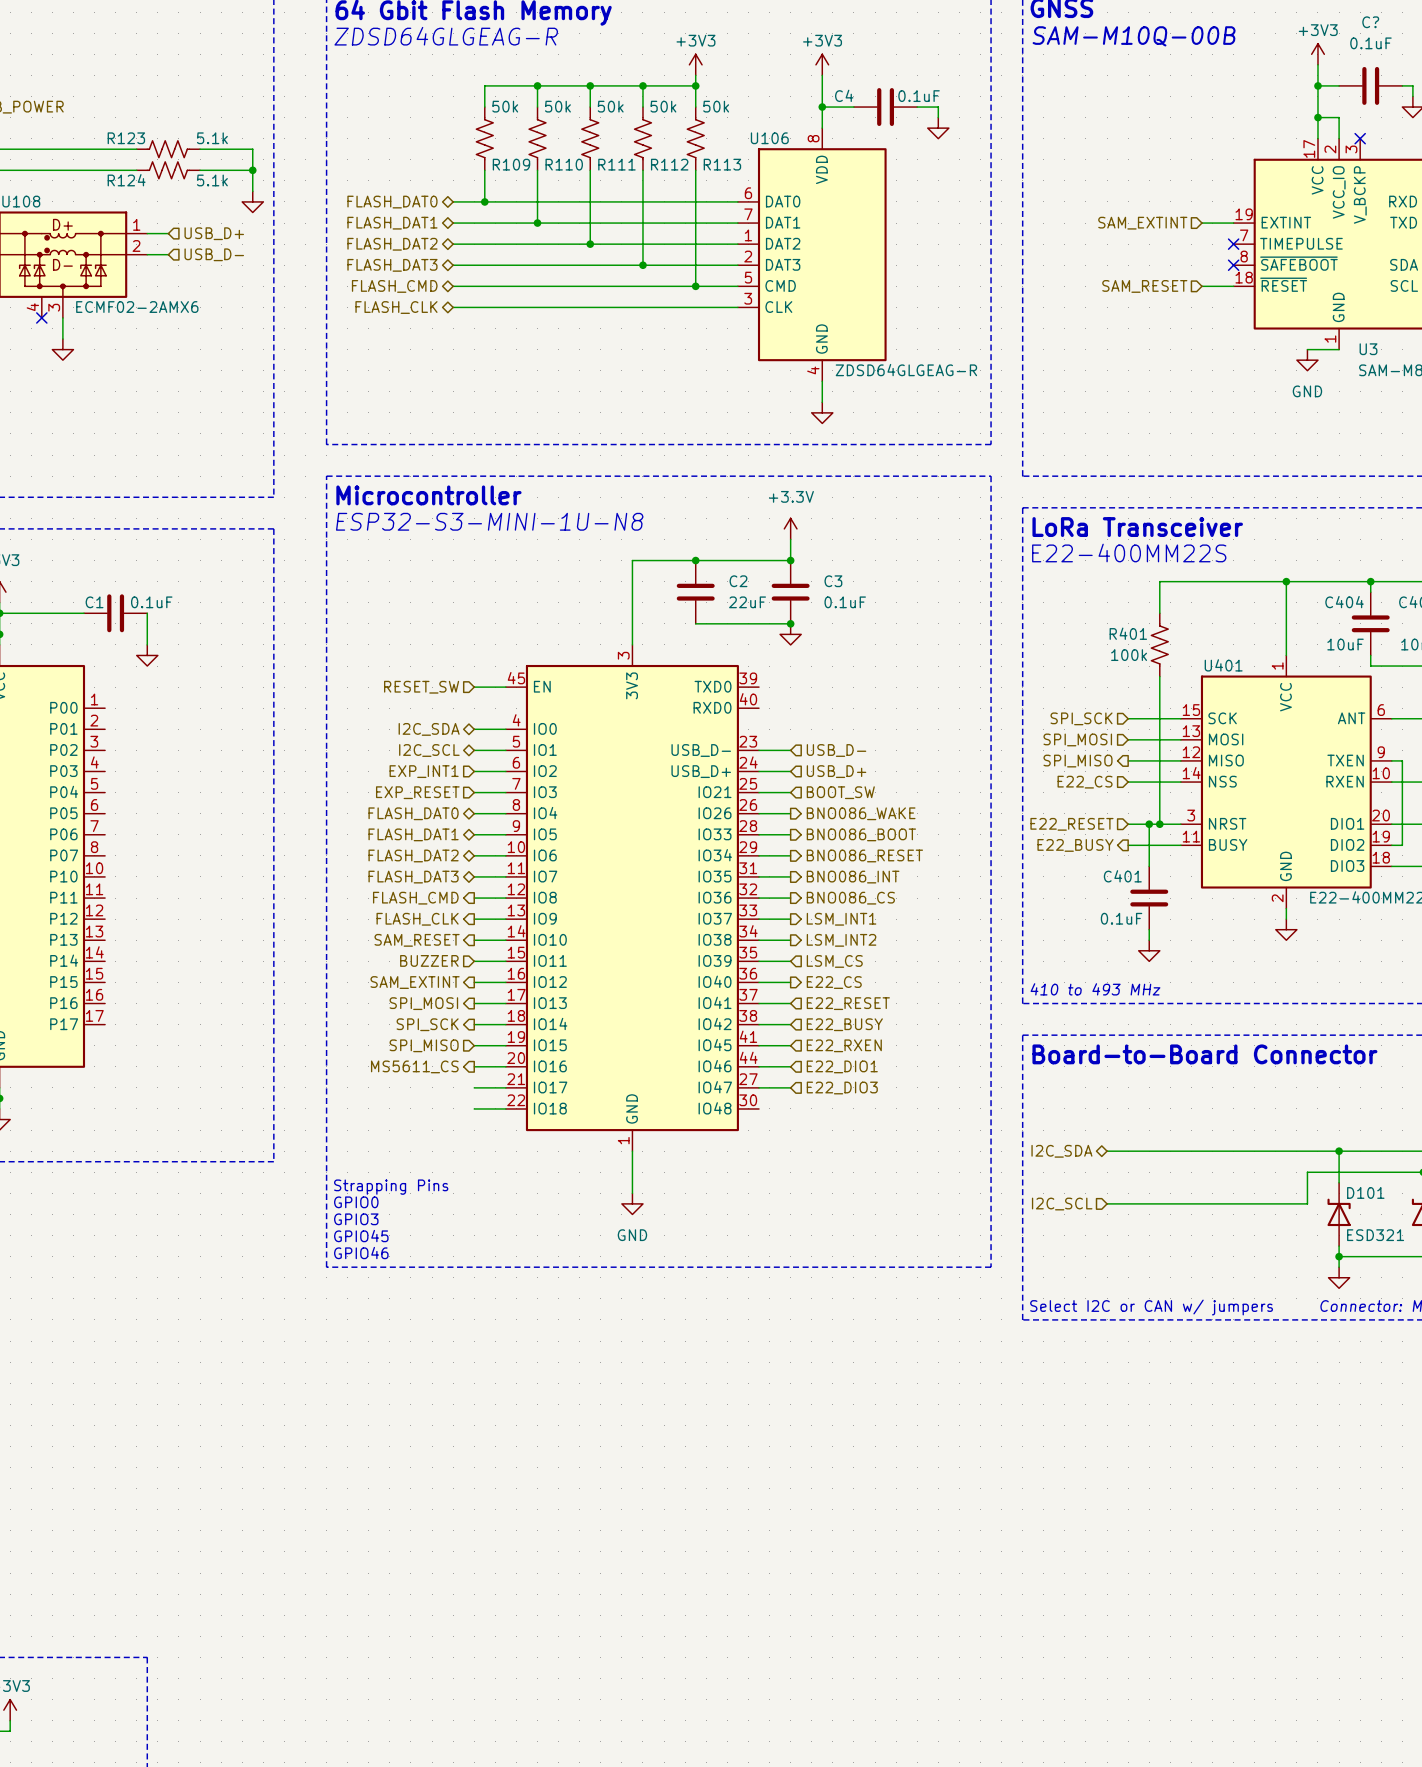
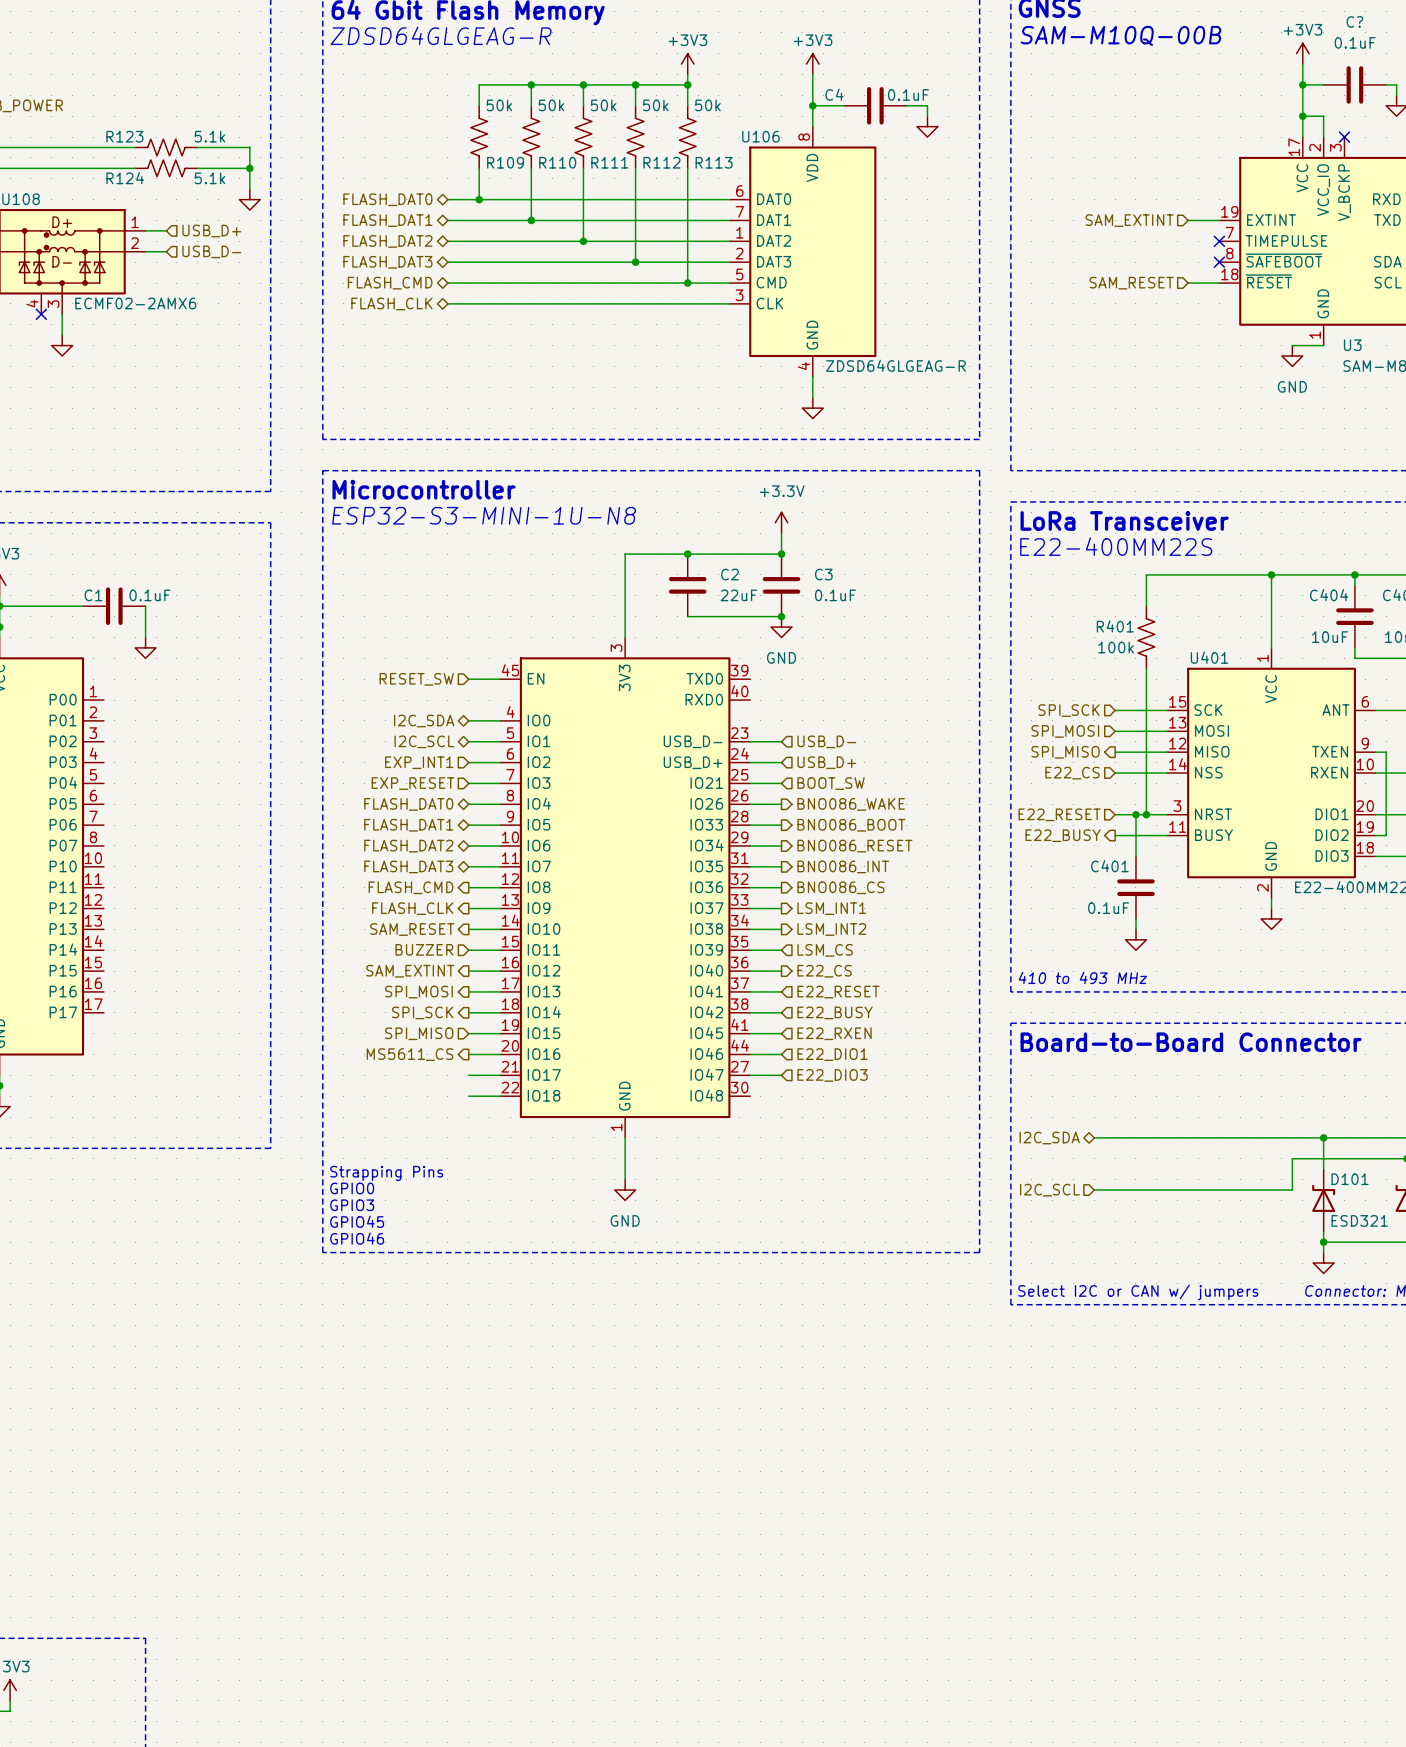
power symbol text: none -> GND (781, 657)

